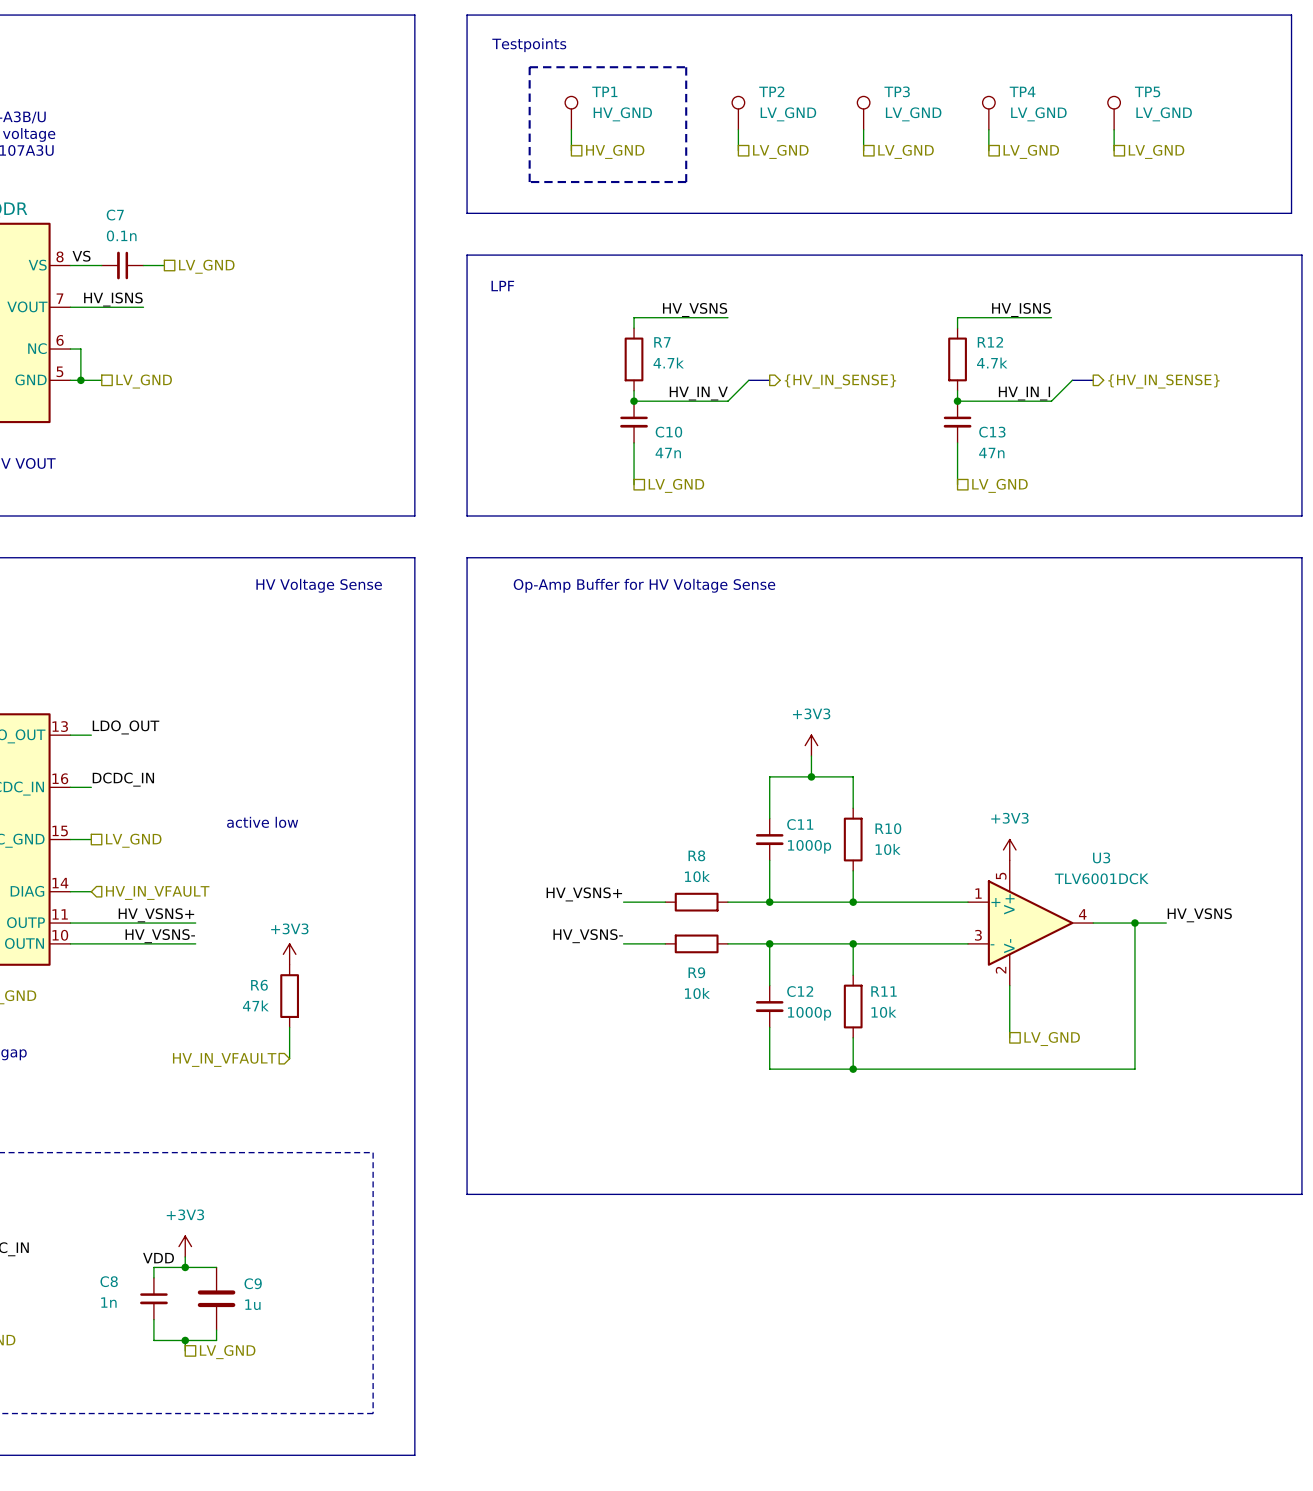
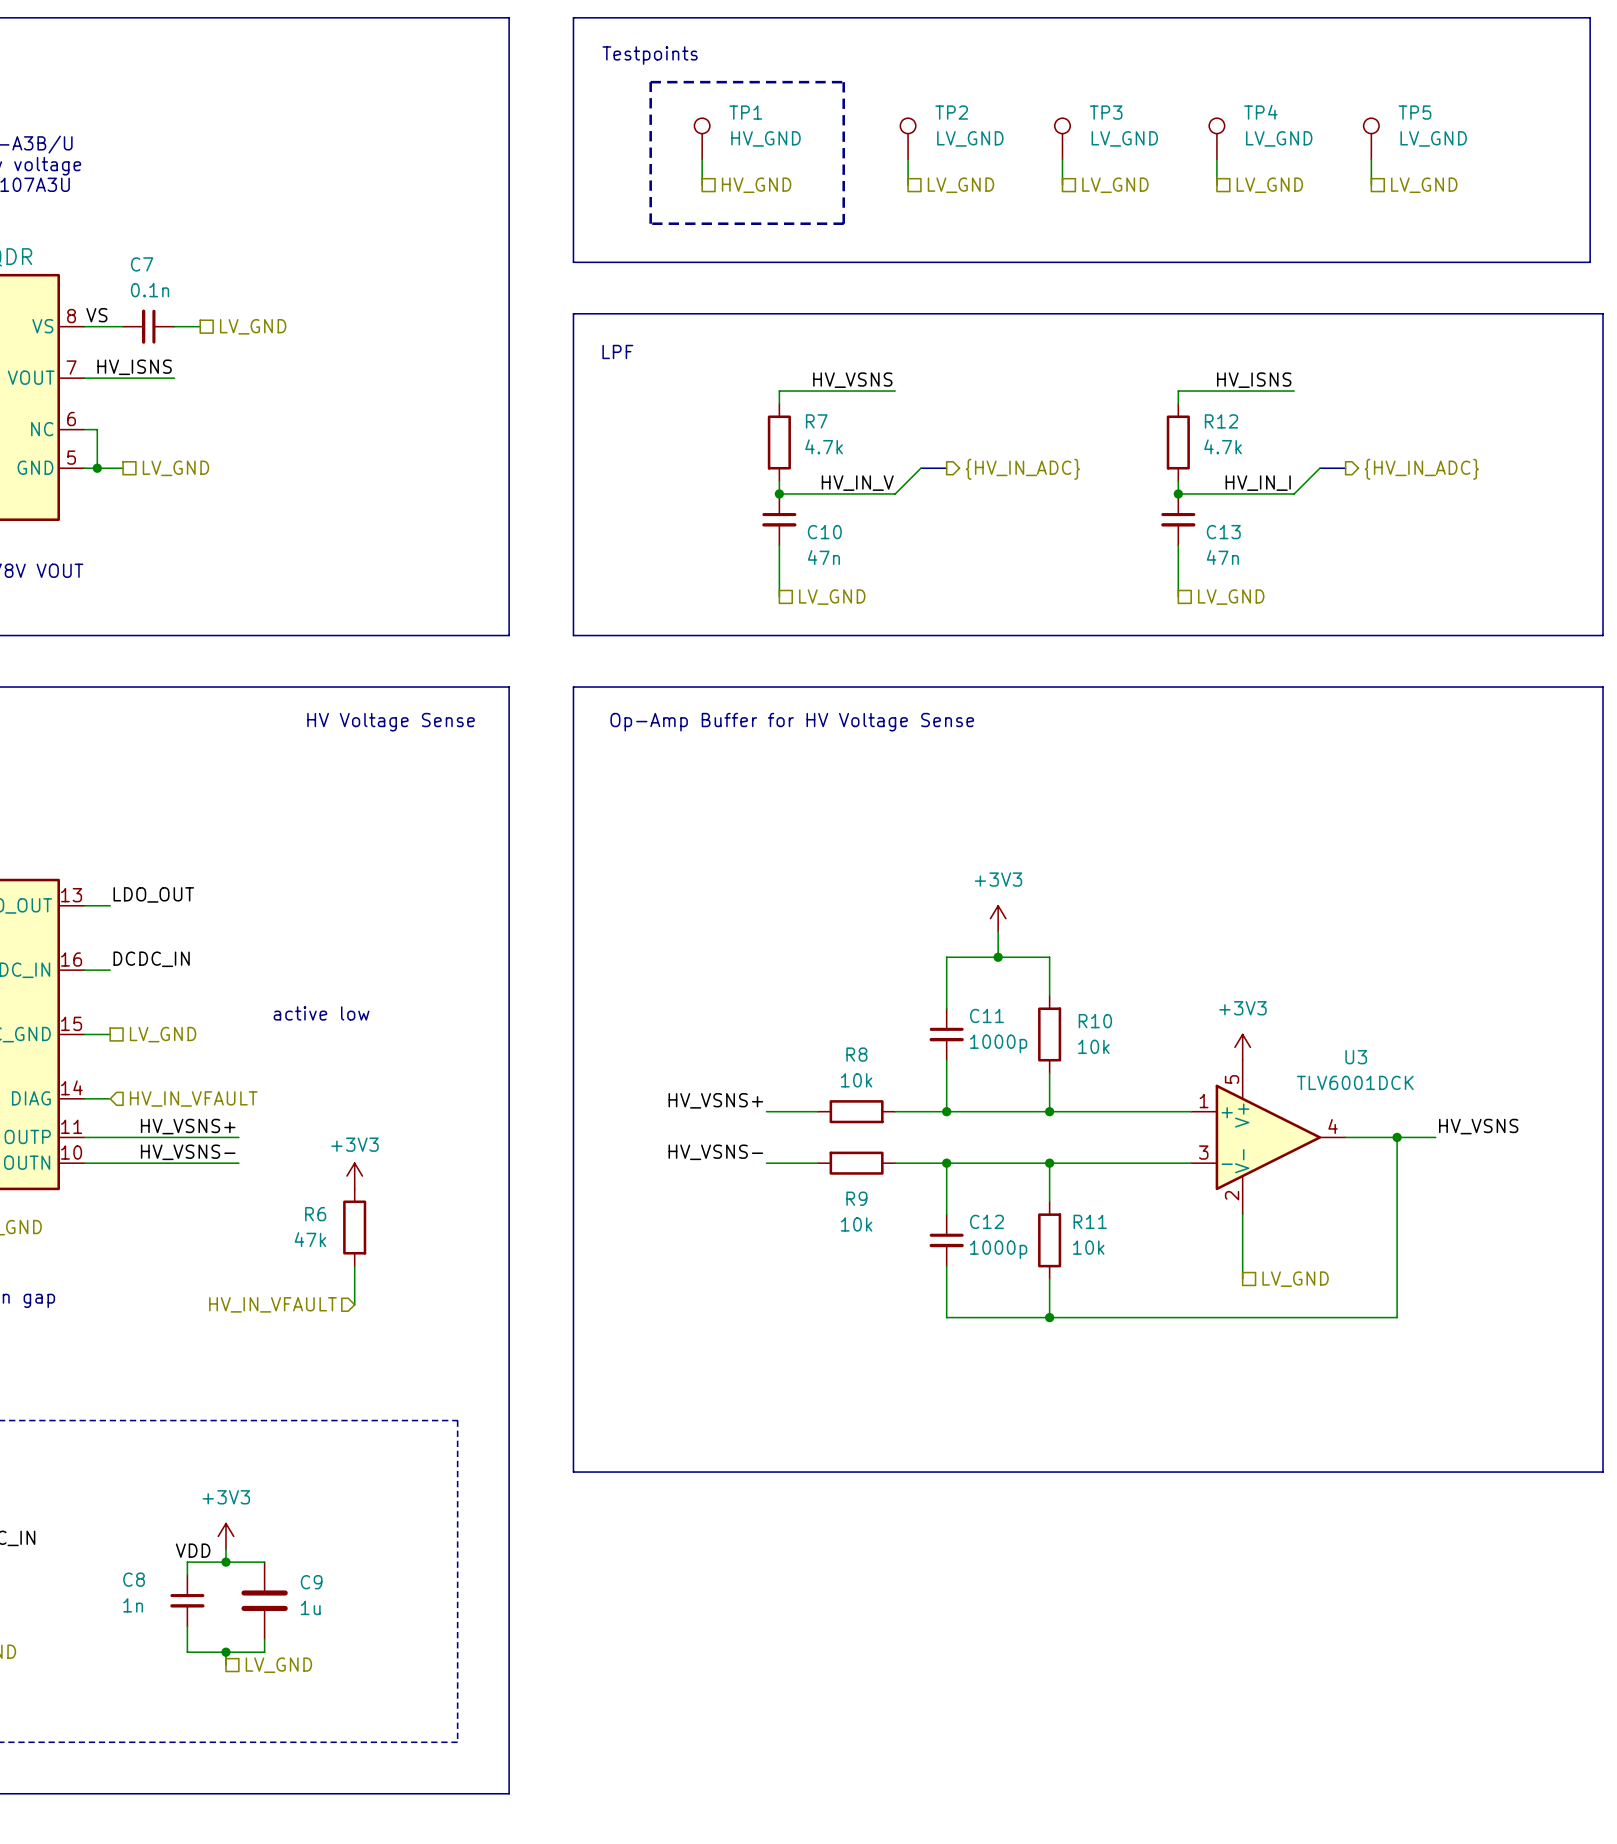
hierarchical label: {HV_IN_SENSE} (840, 381) -> {HV_IN_ADC} (1022, 469)
hierarchical label: {HV_IN_SENSE} (1163, 381) -> {HV_IN_ADC} (1421, 469)

